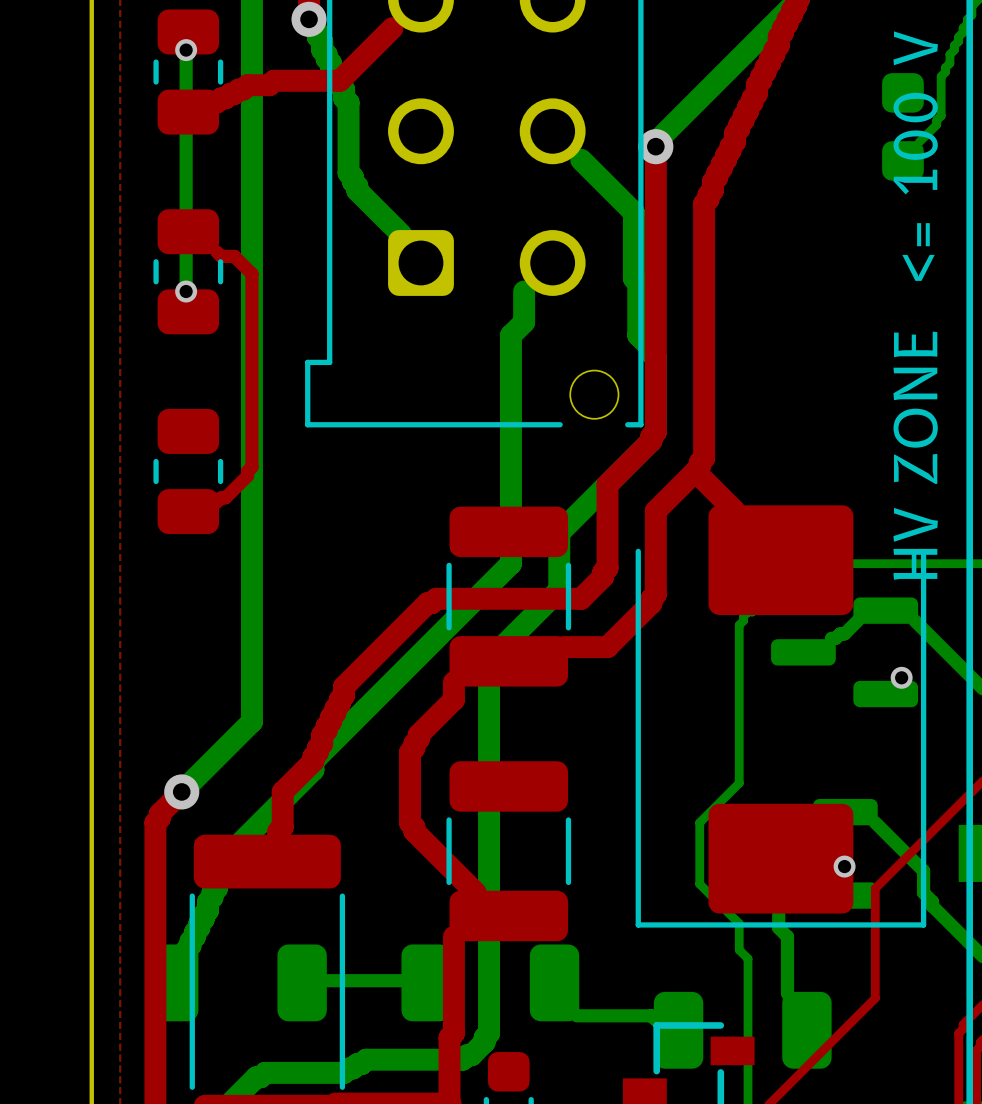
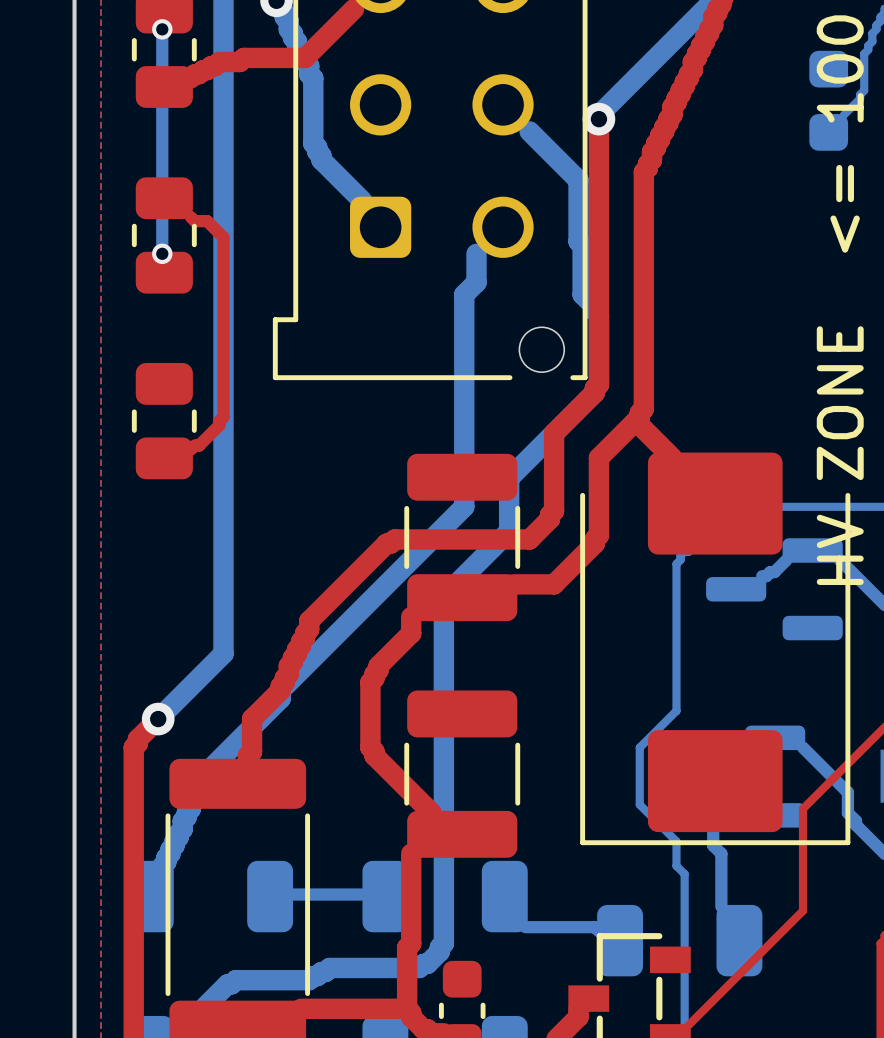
via: (901, 677) -> none
via: (844, 866) -> none

